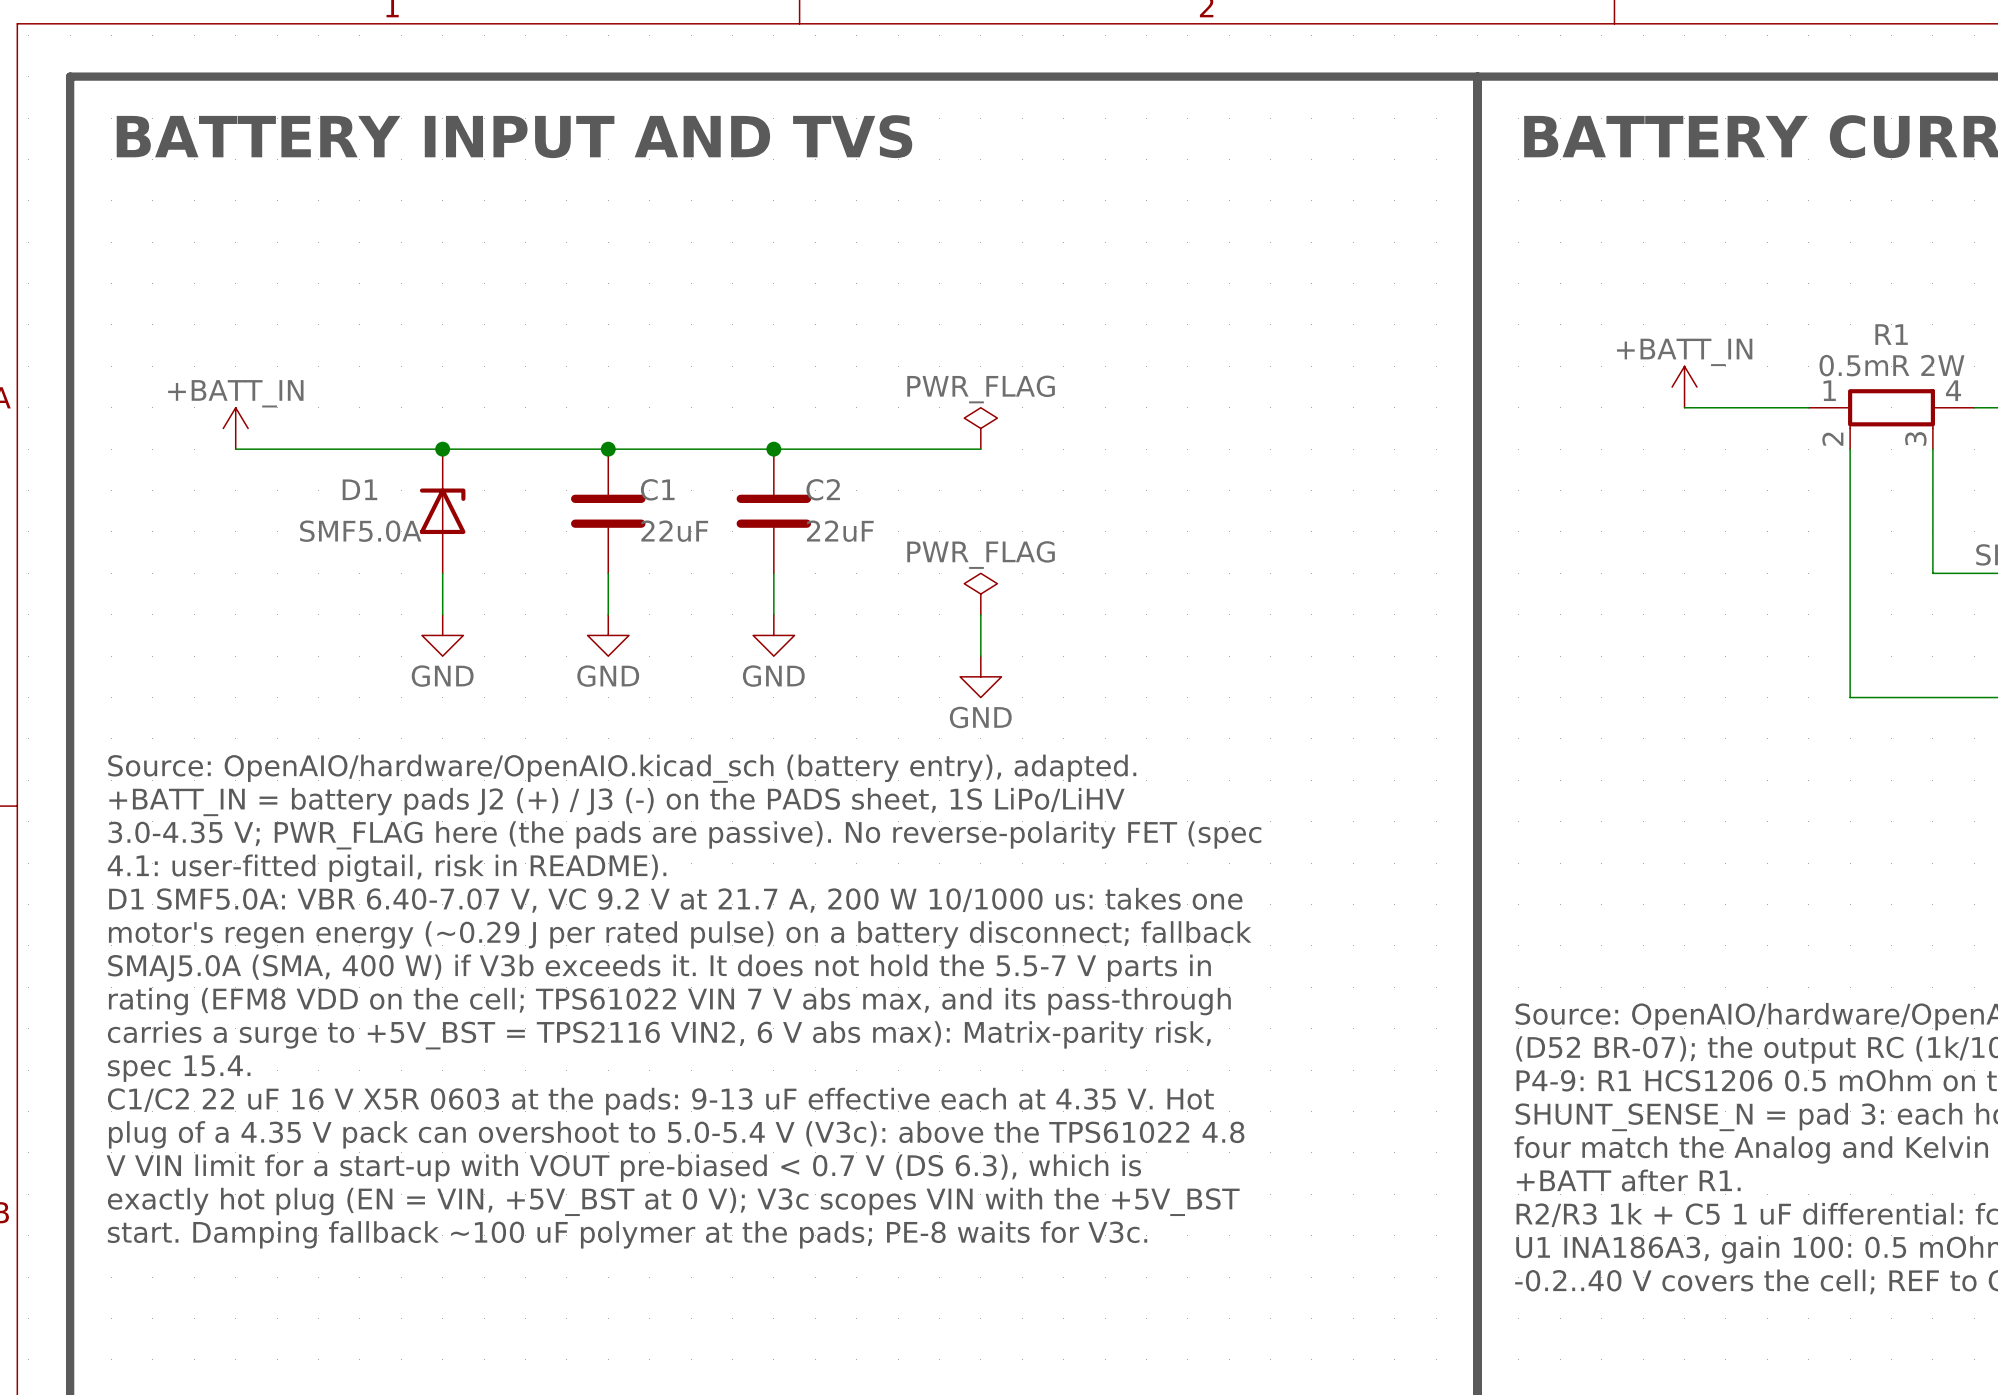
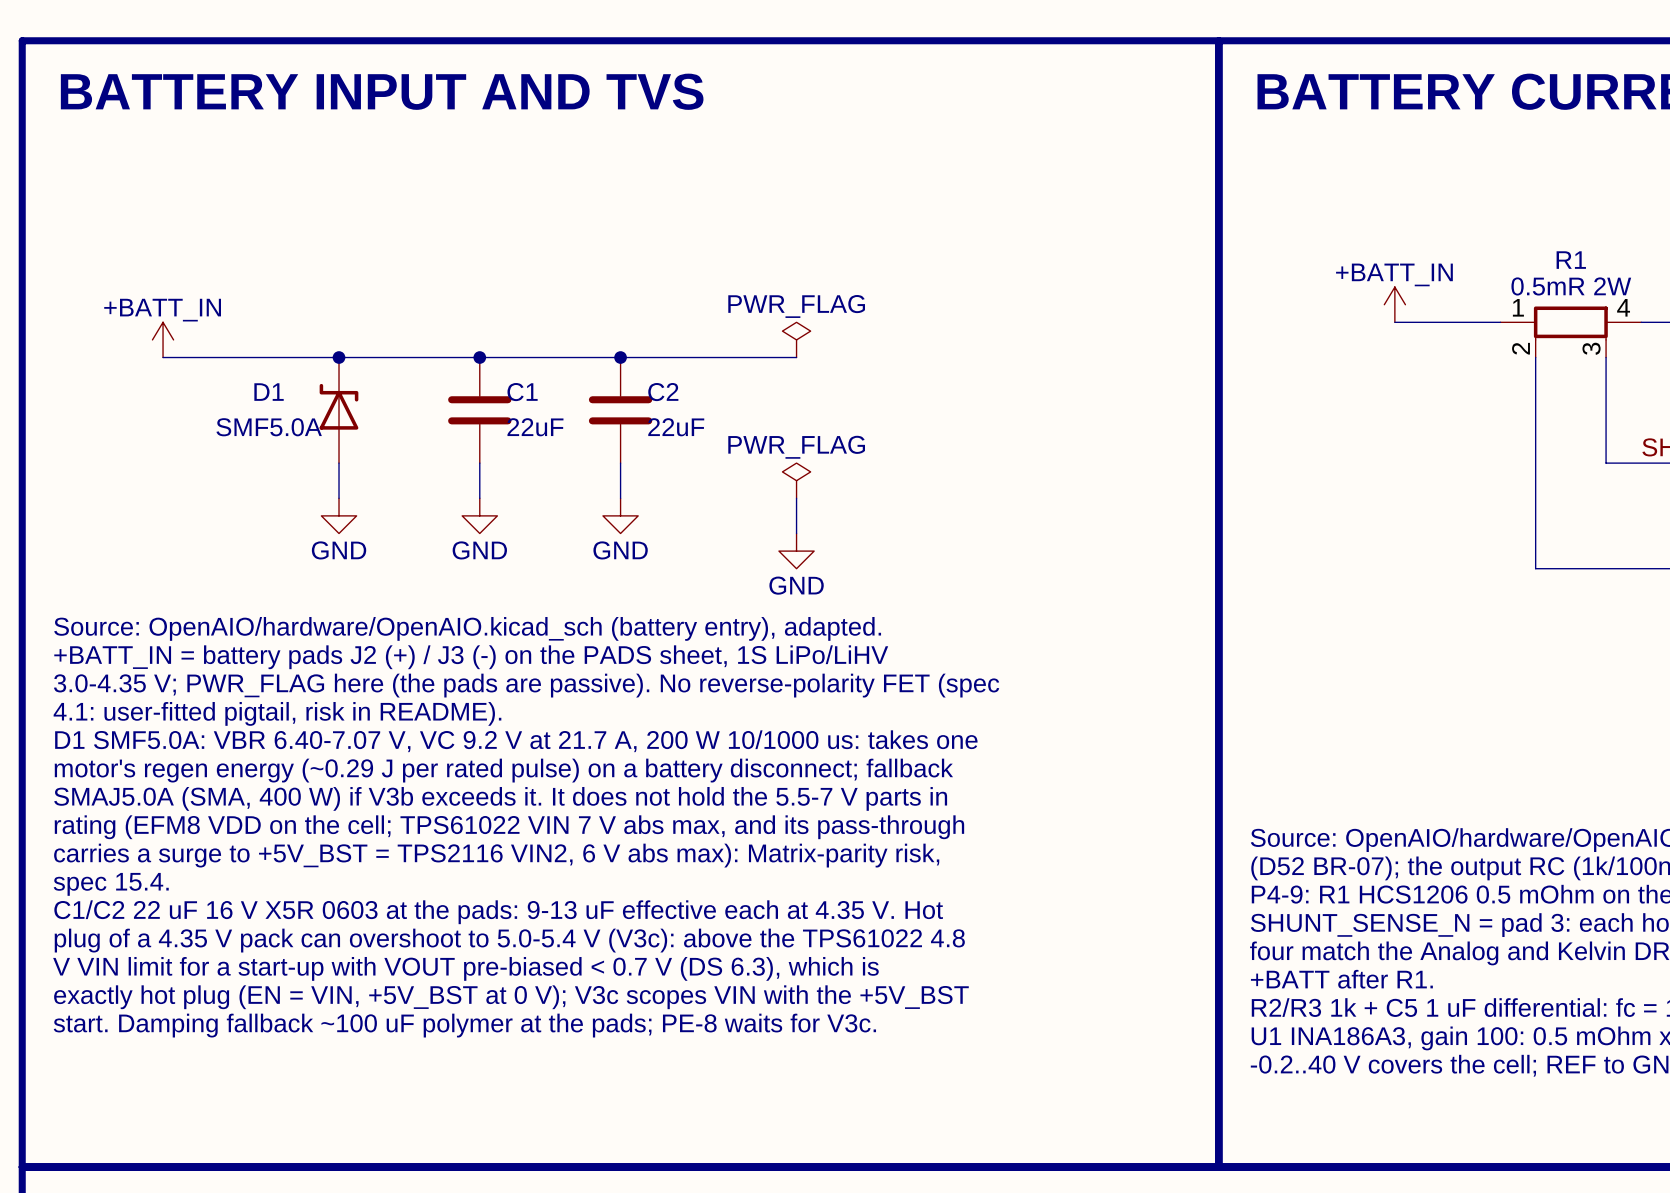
D1 symbol: [419, 449, 466, 574] -> [319, 357, 359, 464]

